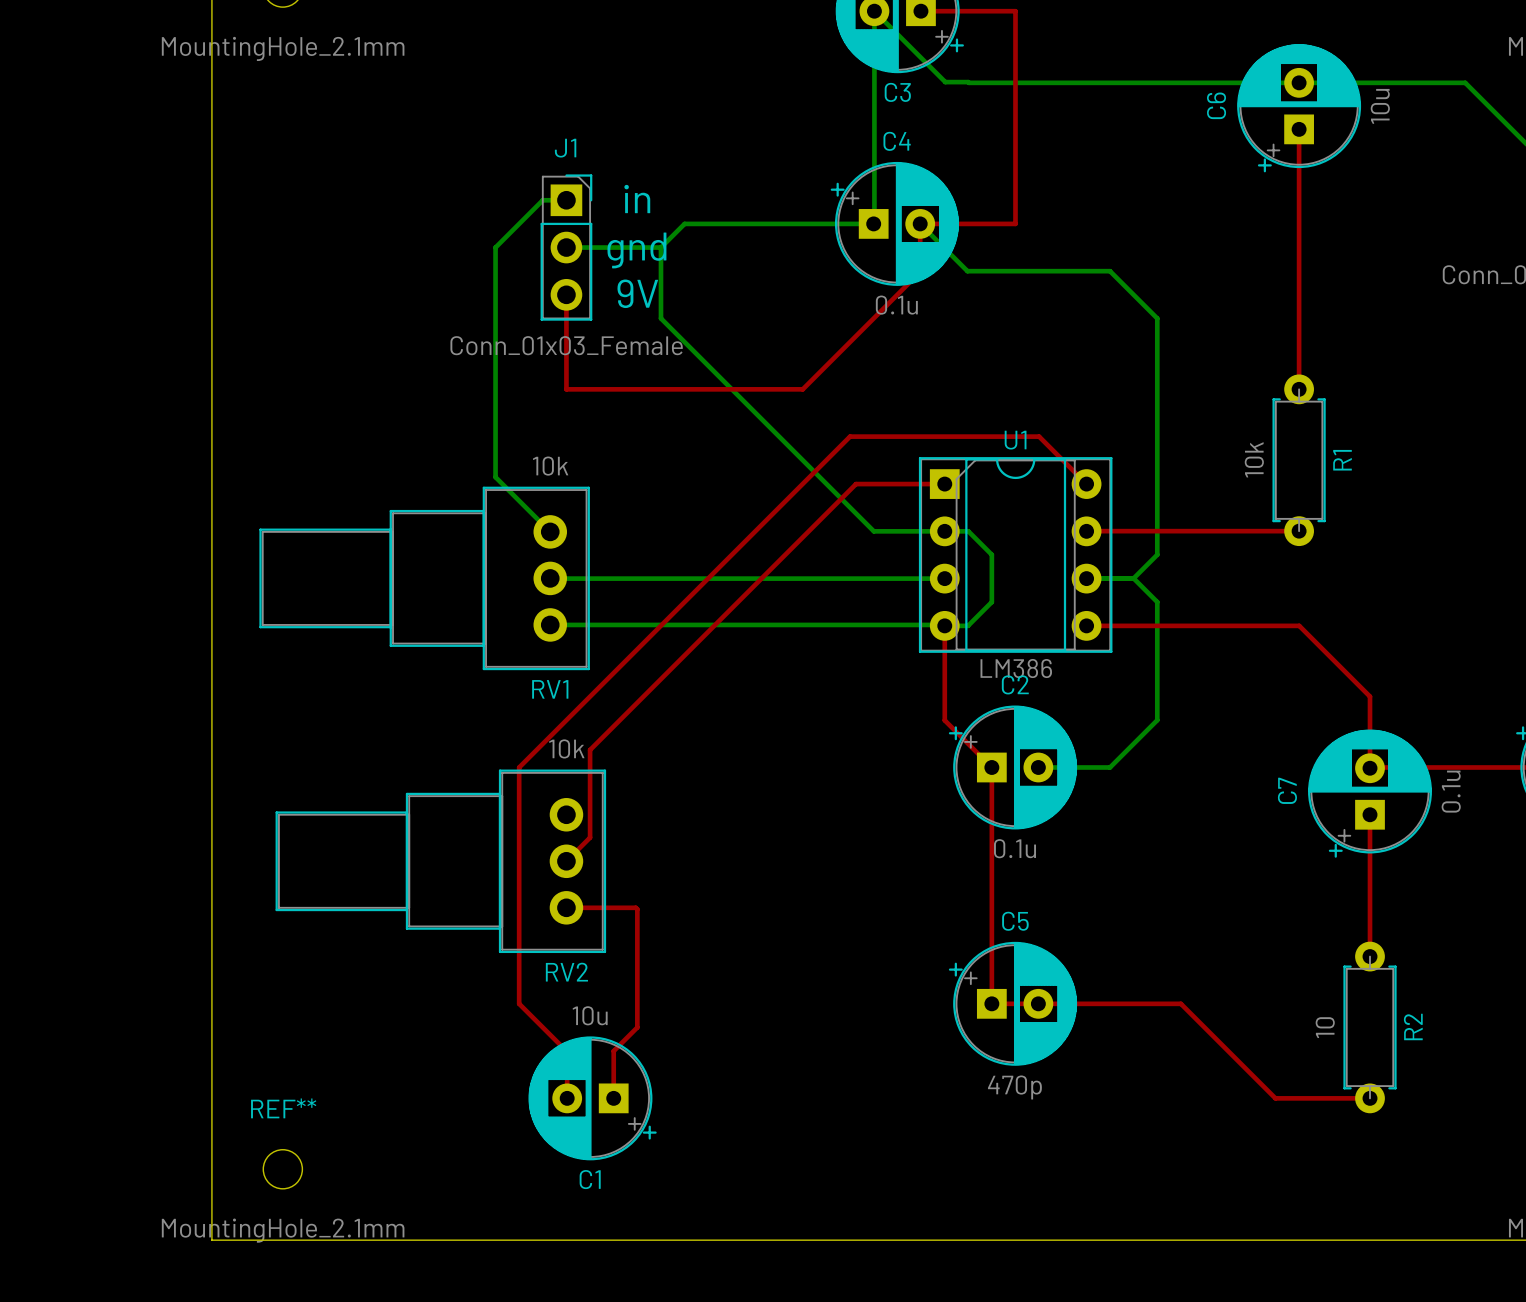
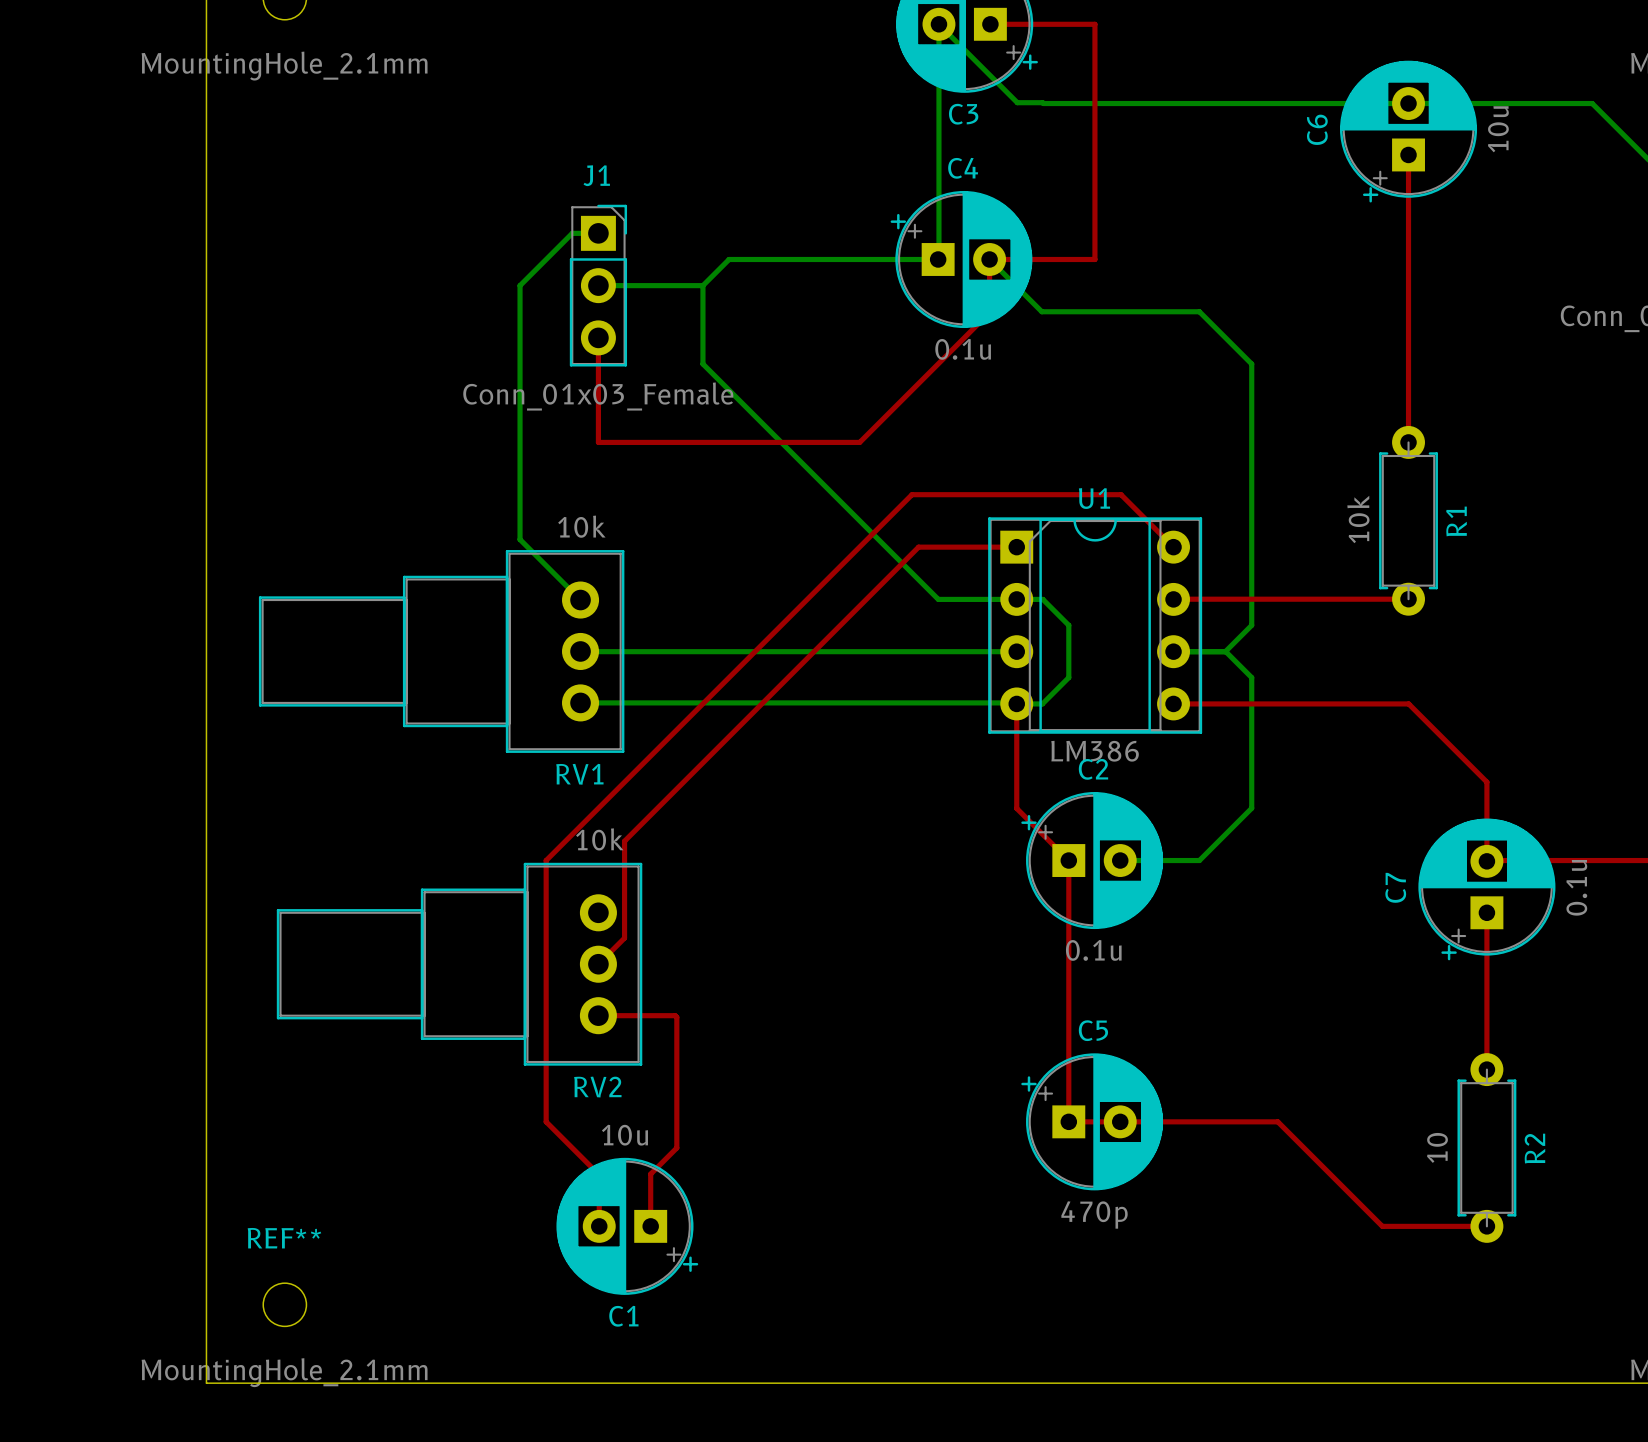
text: in (637, 199) -> none
text: gnd (636, 250) -> none
text: 9V (637, 293) -> none

